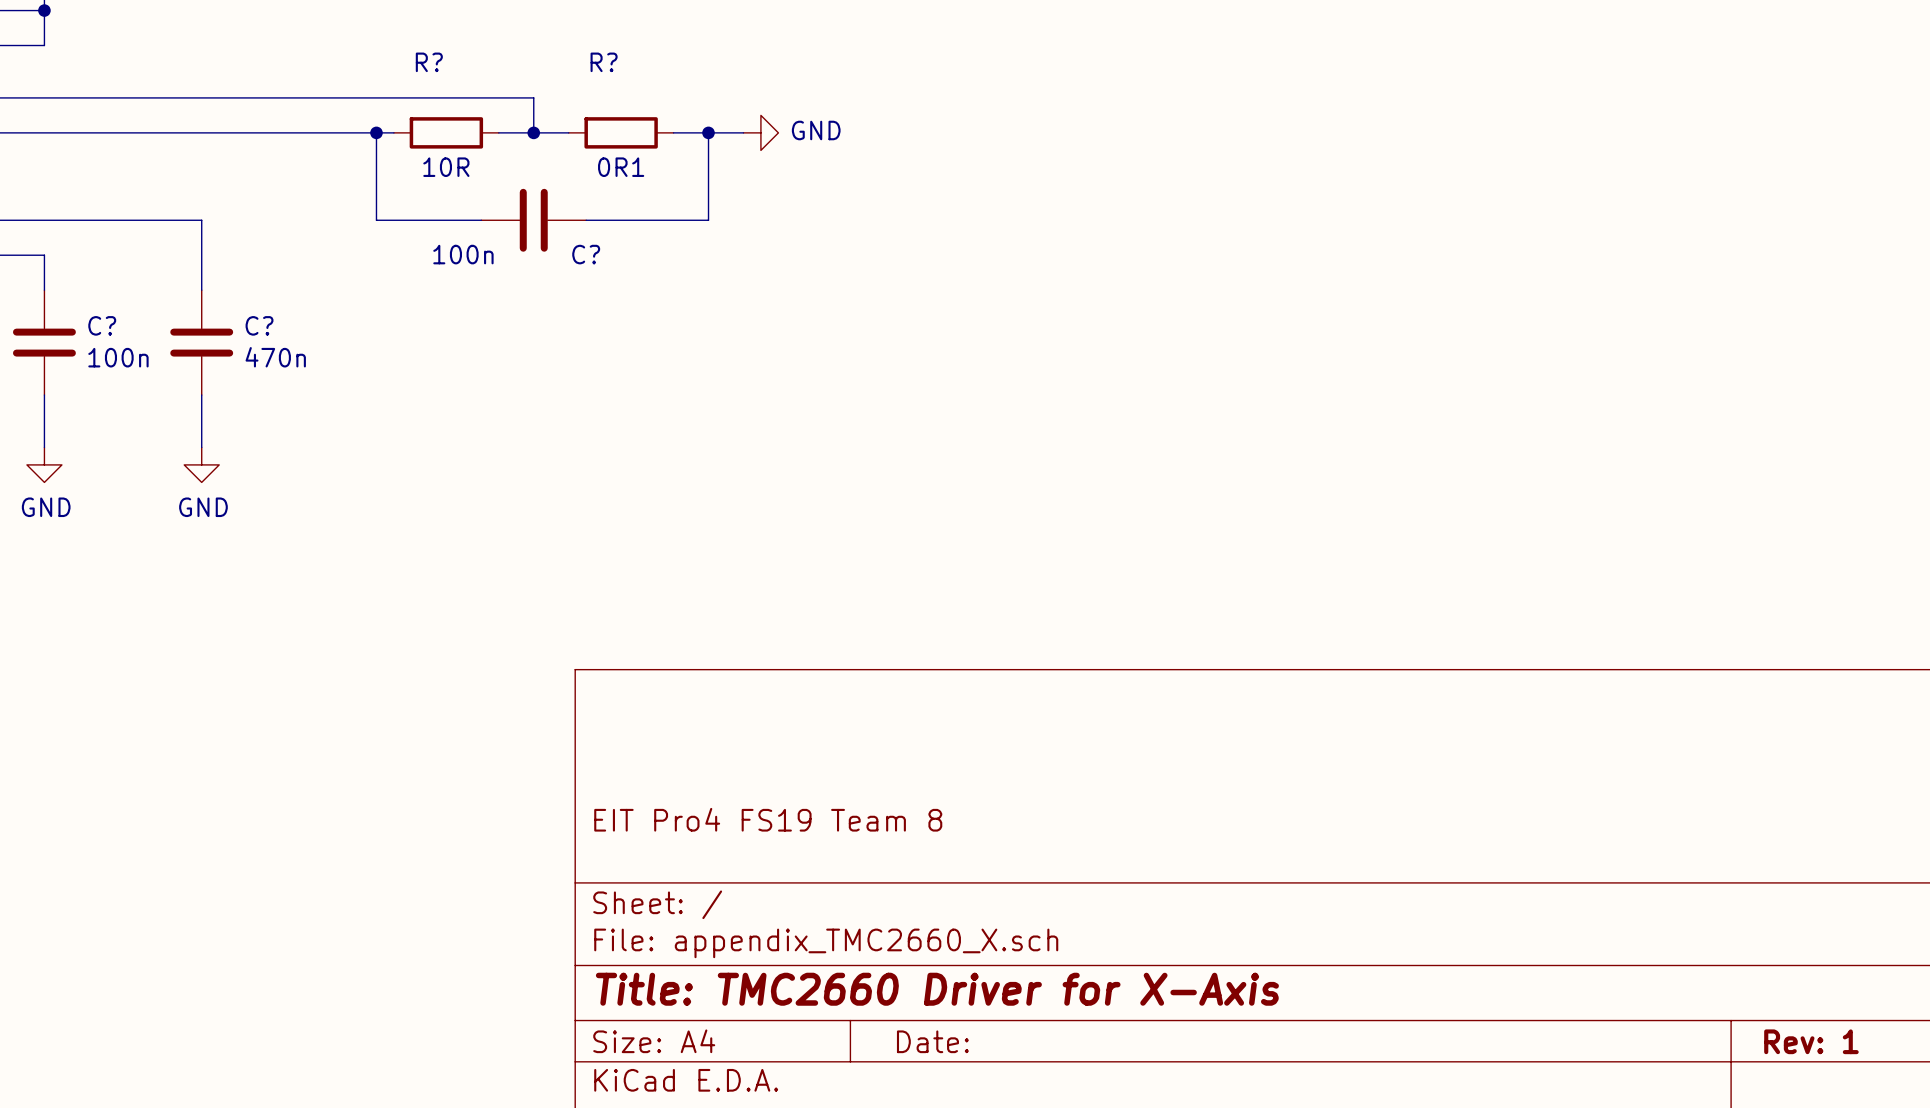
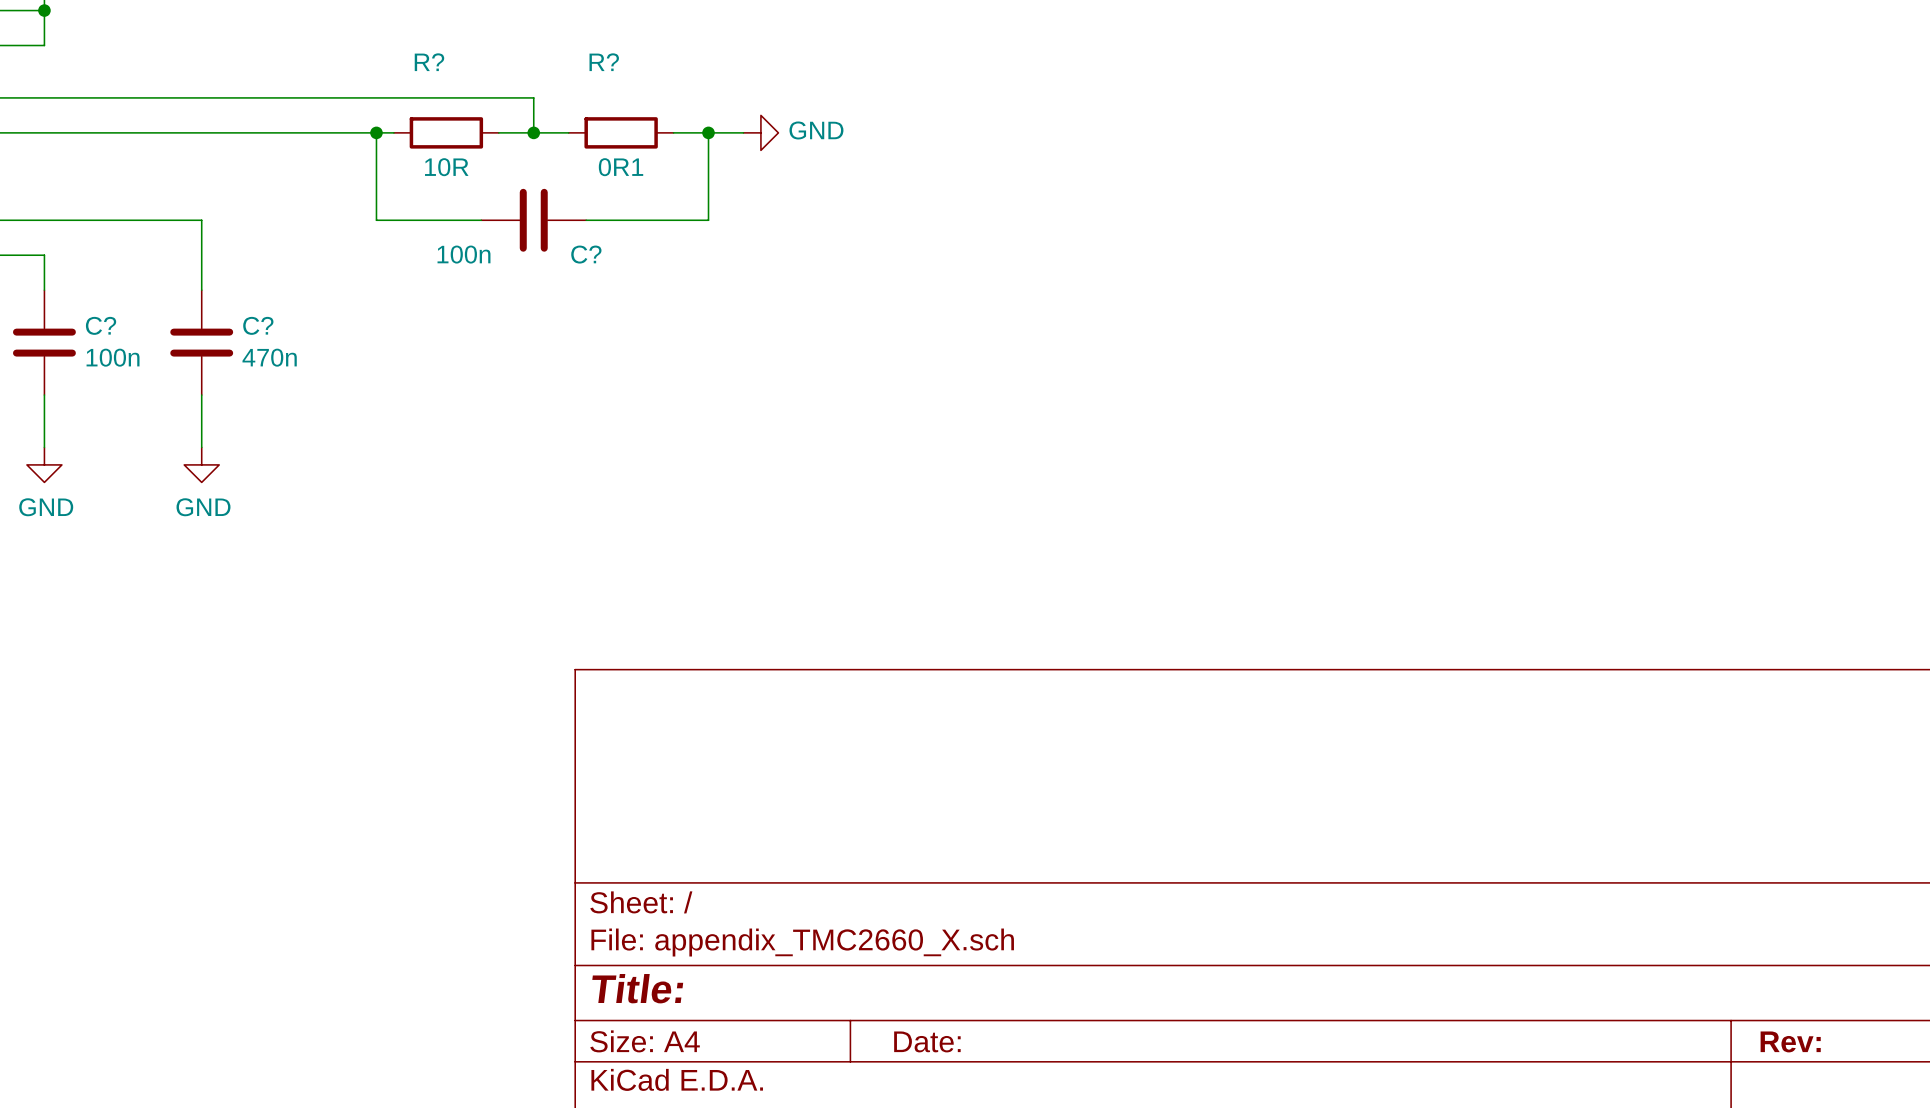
title block: EIT Pro4 FS19 Team 8 (768, 819) -> none
title block: Title: TMC2660 Driver for X-Axis (937, 989) -> Title: (637, 988)
title block: Rev: 1 (1811, 1041) -> Rev: (1790, 1041)

